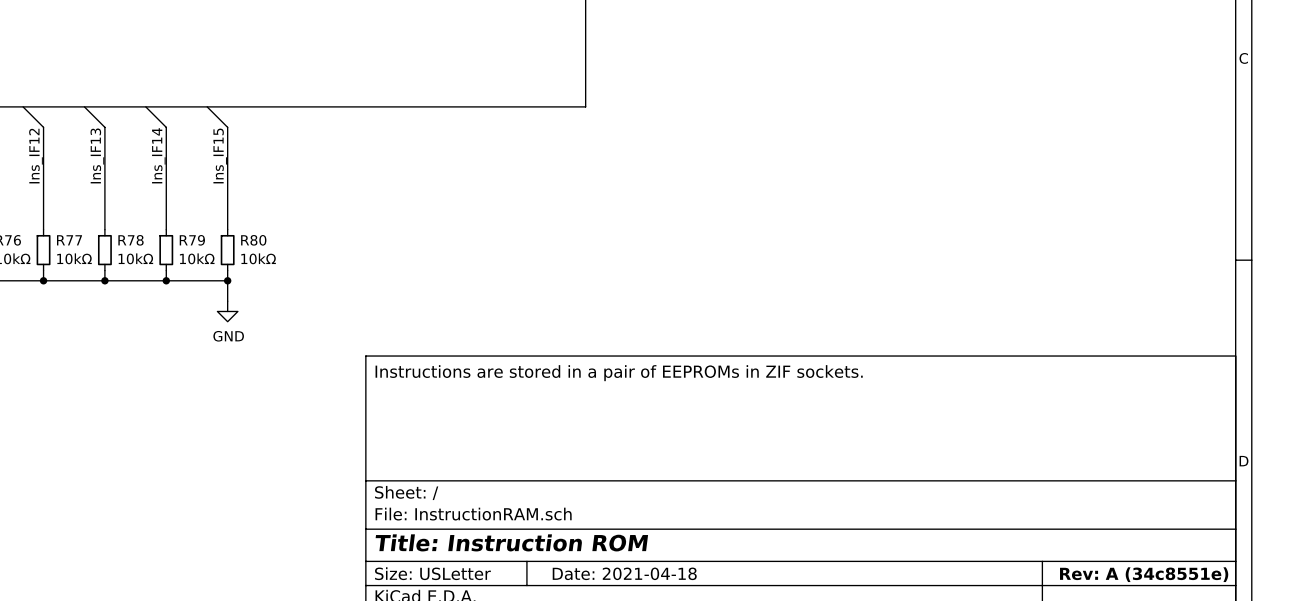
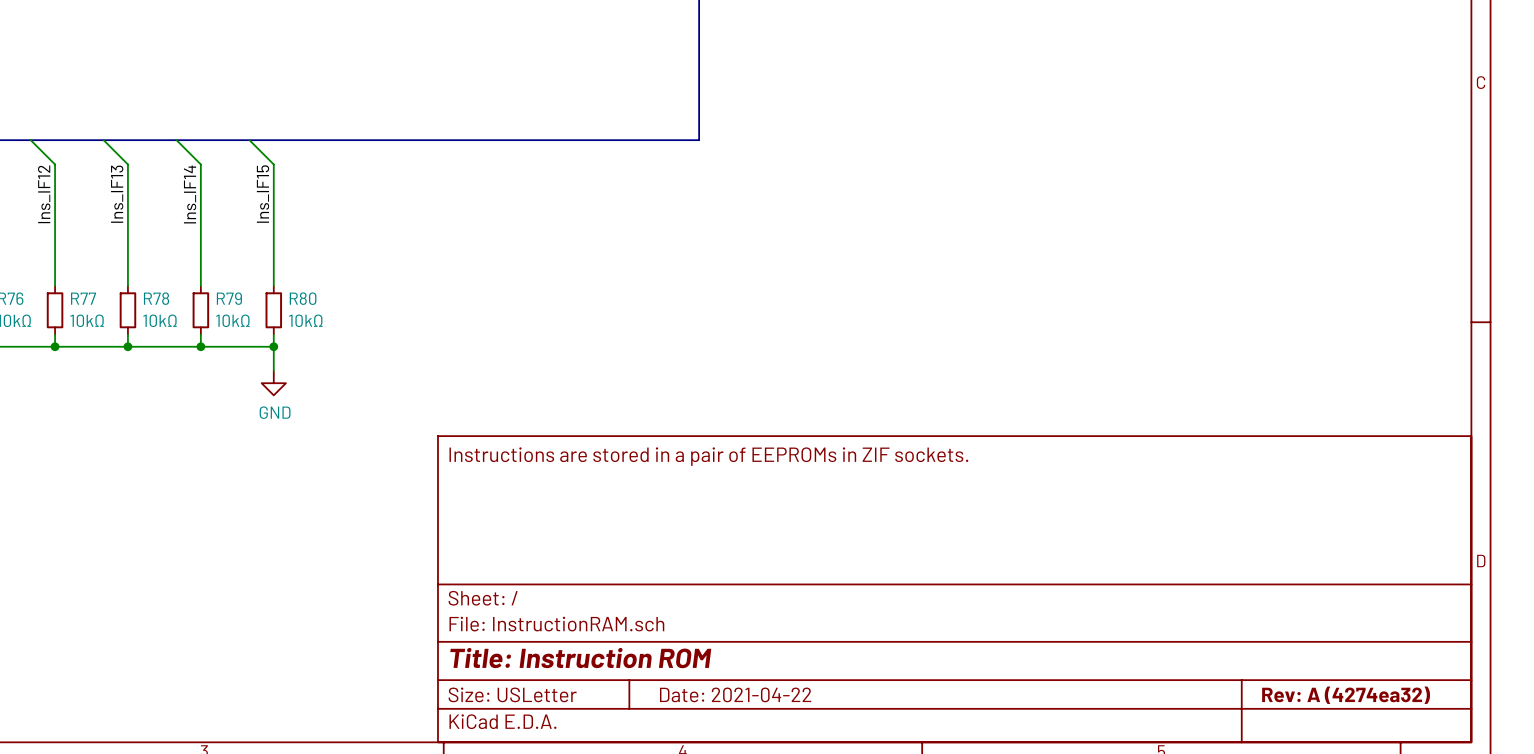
title block: Date: 2021-04-18 (624, 573) -> Date: 2021-04-22 (735, 694)
title block: Rev: A (34c8551e) (1144, 574) -> Rev: A (4274ea32) (1346, 695)

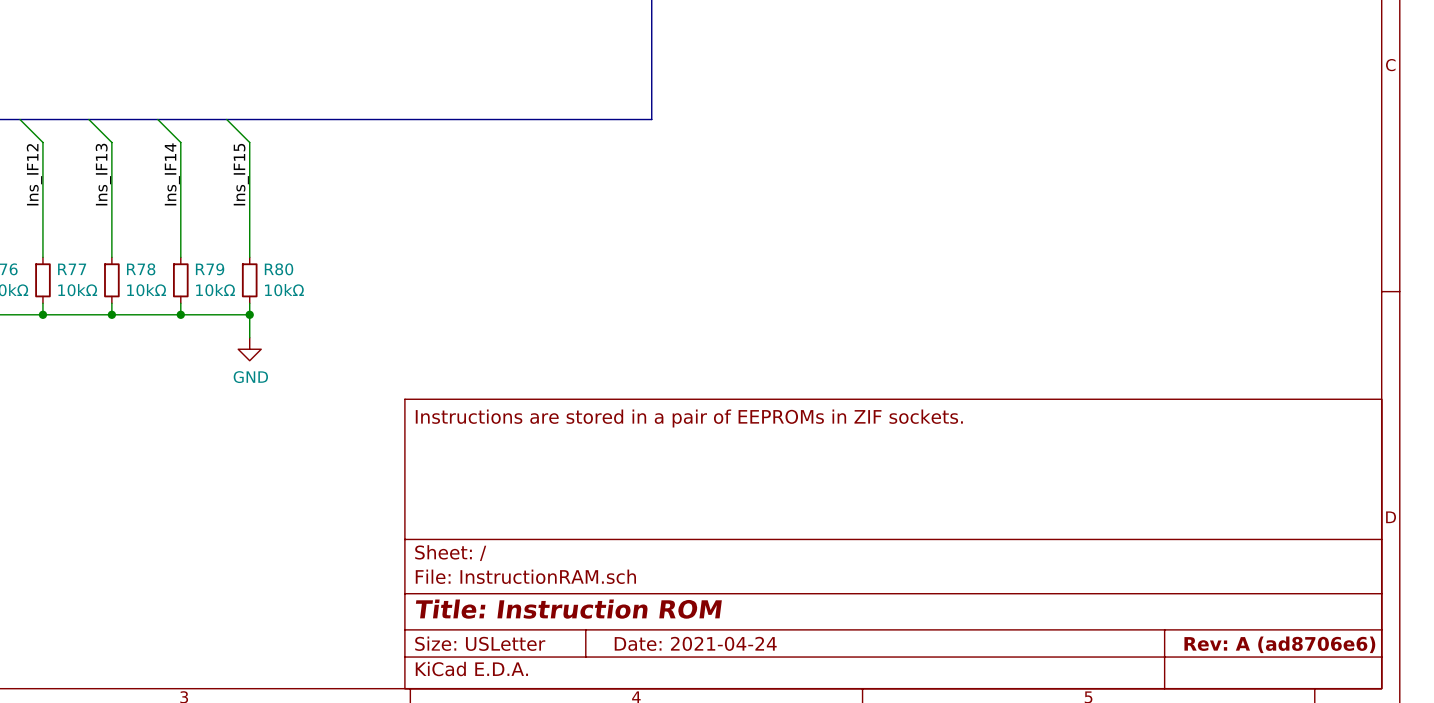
title block: Date: 2021-04-22 (735, 694) -> Date: 2021-04-24 (695, 643)
title block: Rev: A (4274ea32) (1346, 695) -> Rev: A (ad8706e6) (1279, 644)

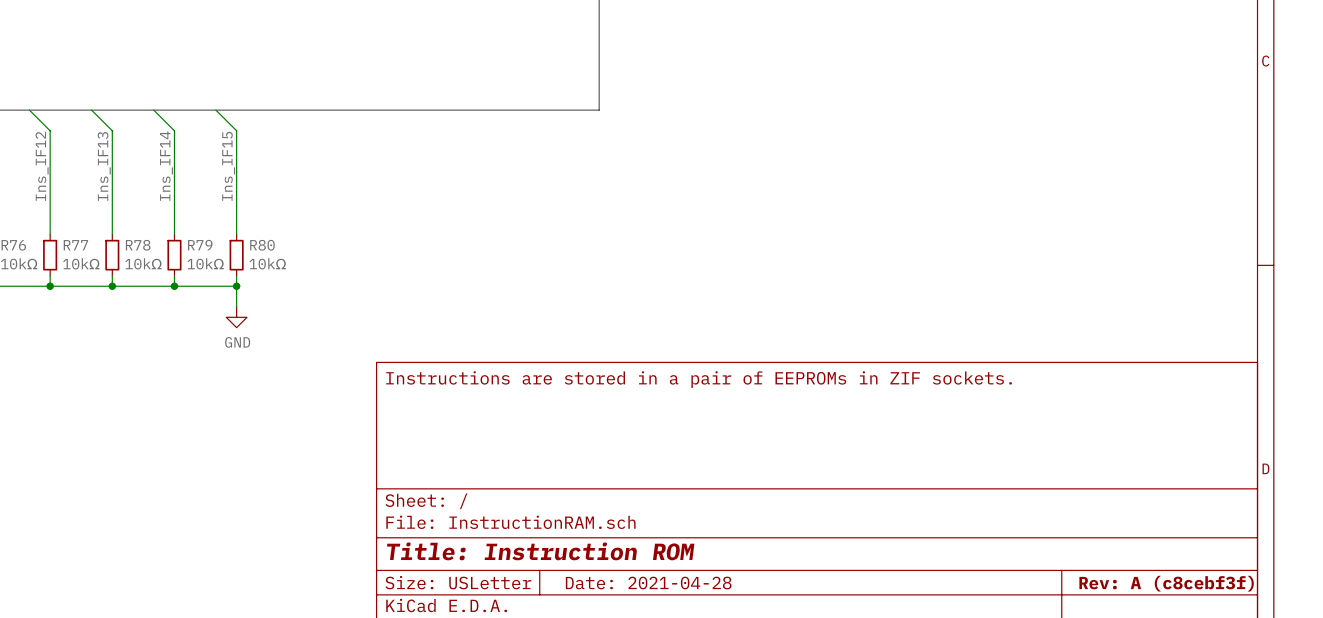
title block: Date: 2021-04-24 (695, 643) -> Date: 2021-04-28 (648, 583)
title block: Rev: A (ad8706e6) (1279, 644) -> Rev: A (c8cebf3f) (1166, 583)

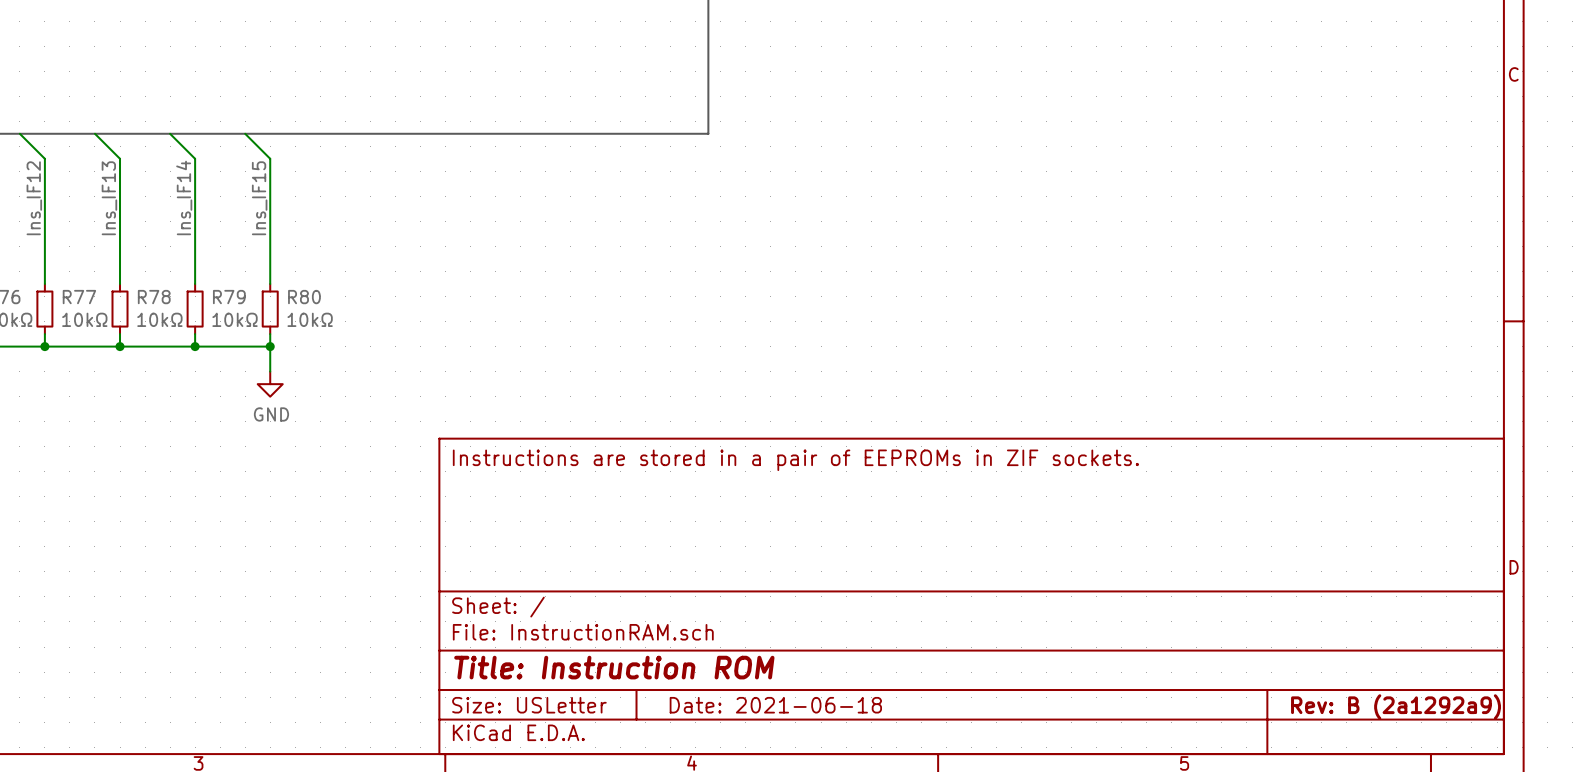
title block: Date: 2021-04-28 (648, 583) -> Date: 2021-06-18 (775, 705)
title block: Rev: A (c8cebf3f) (1166, 583) -> Rev: B (2a1292a9) (1396, 706)

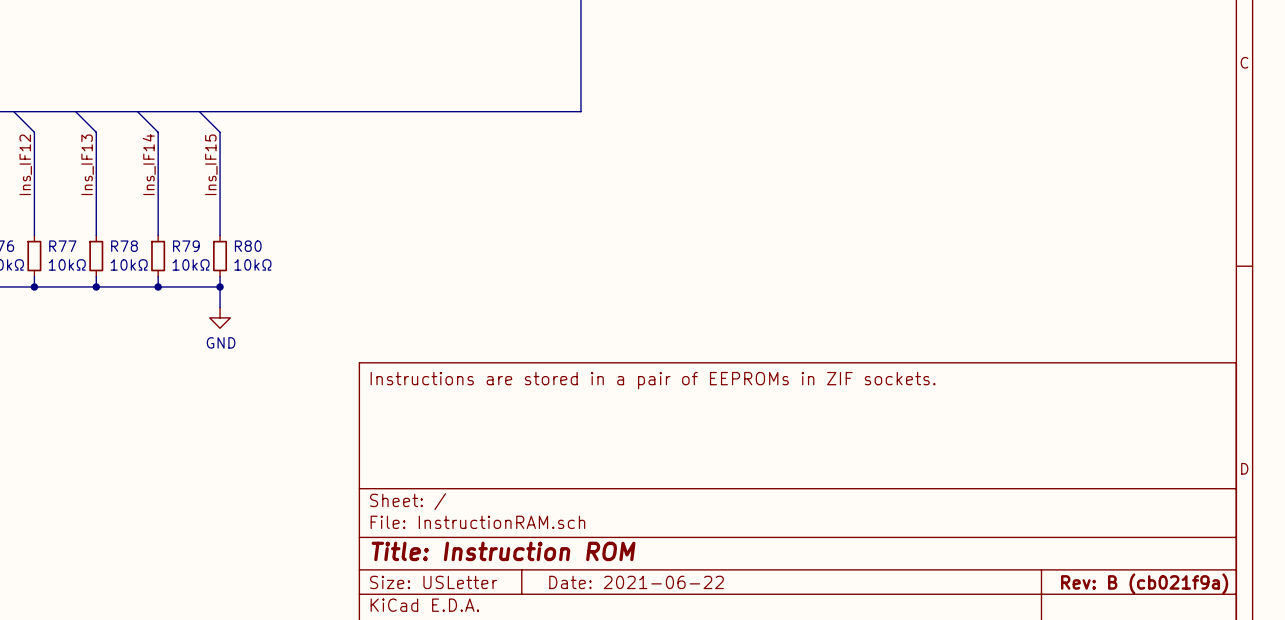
title block: Date: 2021-06-18 (775, 705) -> Date: 2021-06-22 (636, 582)
title block: Rev: B (2a1292a9) (1396, 706) -> Rev: B (cb021f9a) (1144, 583)

